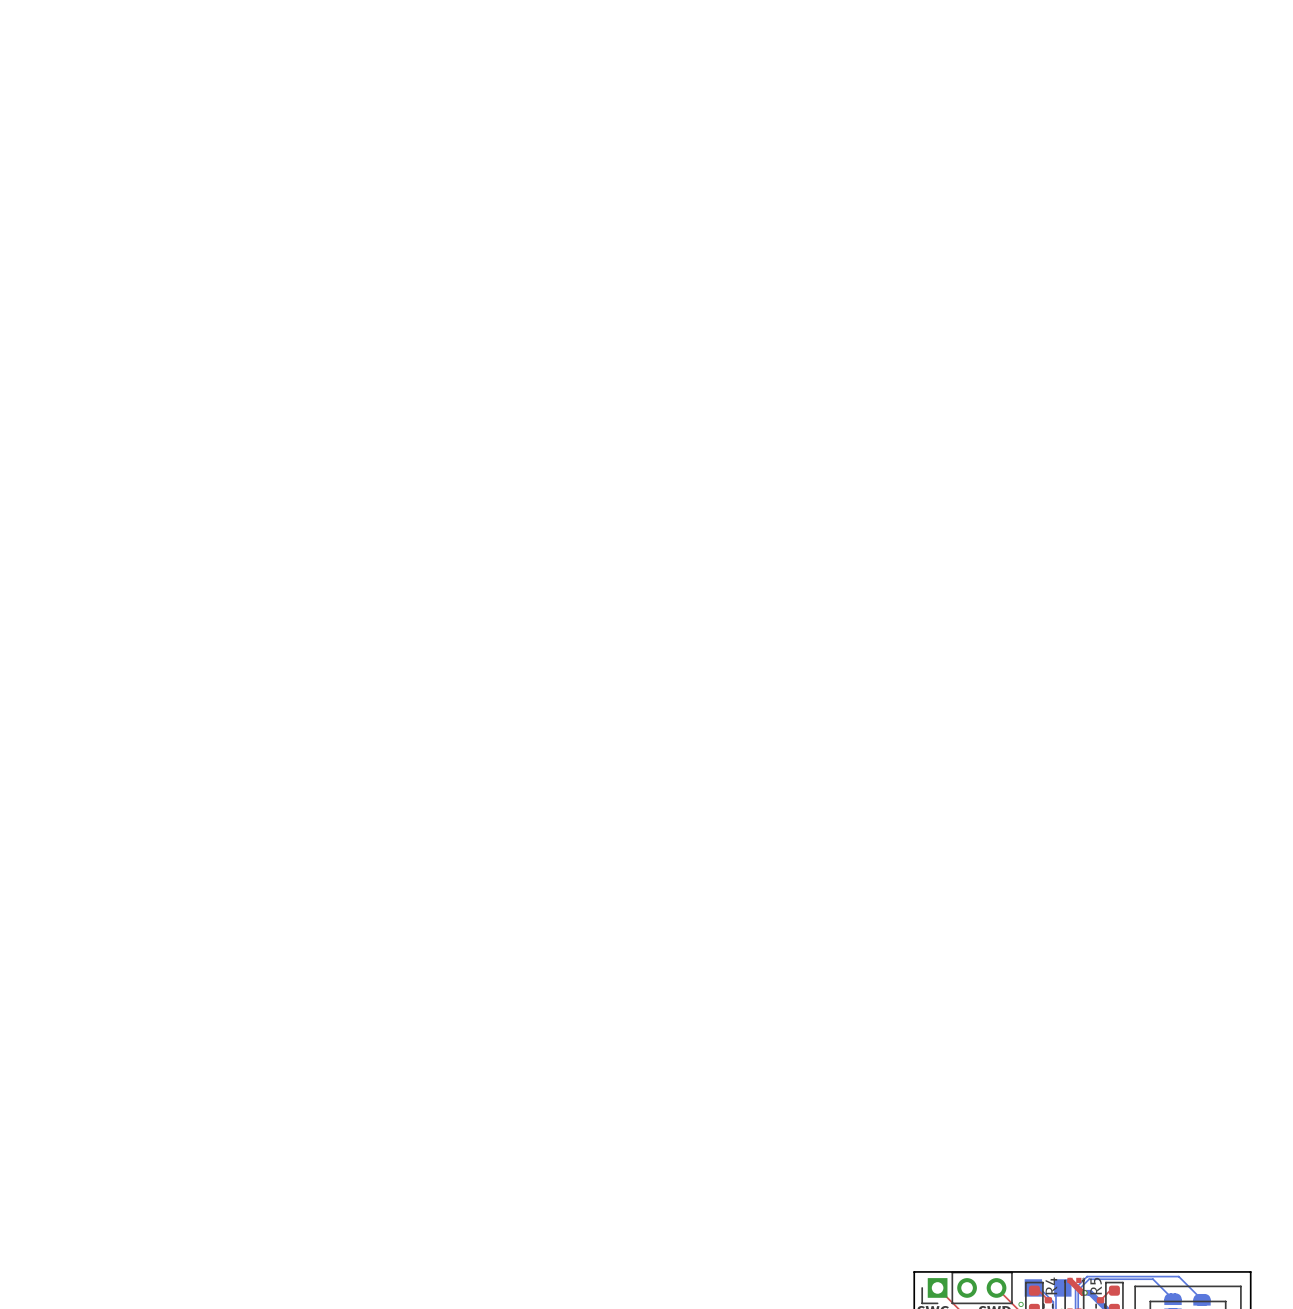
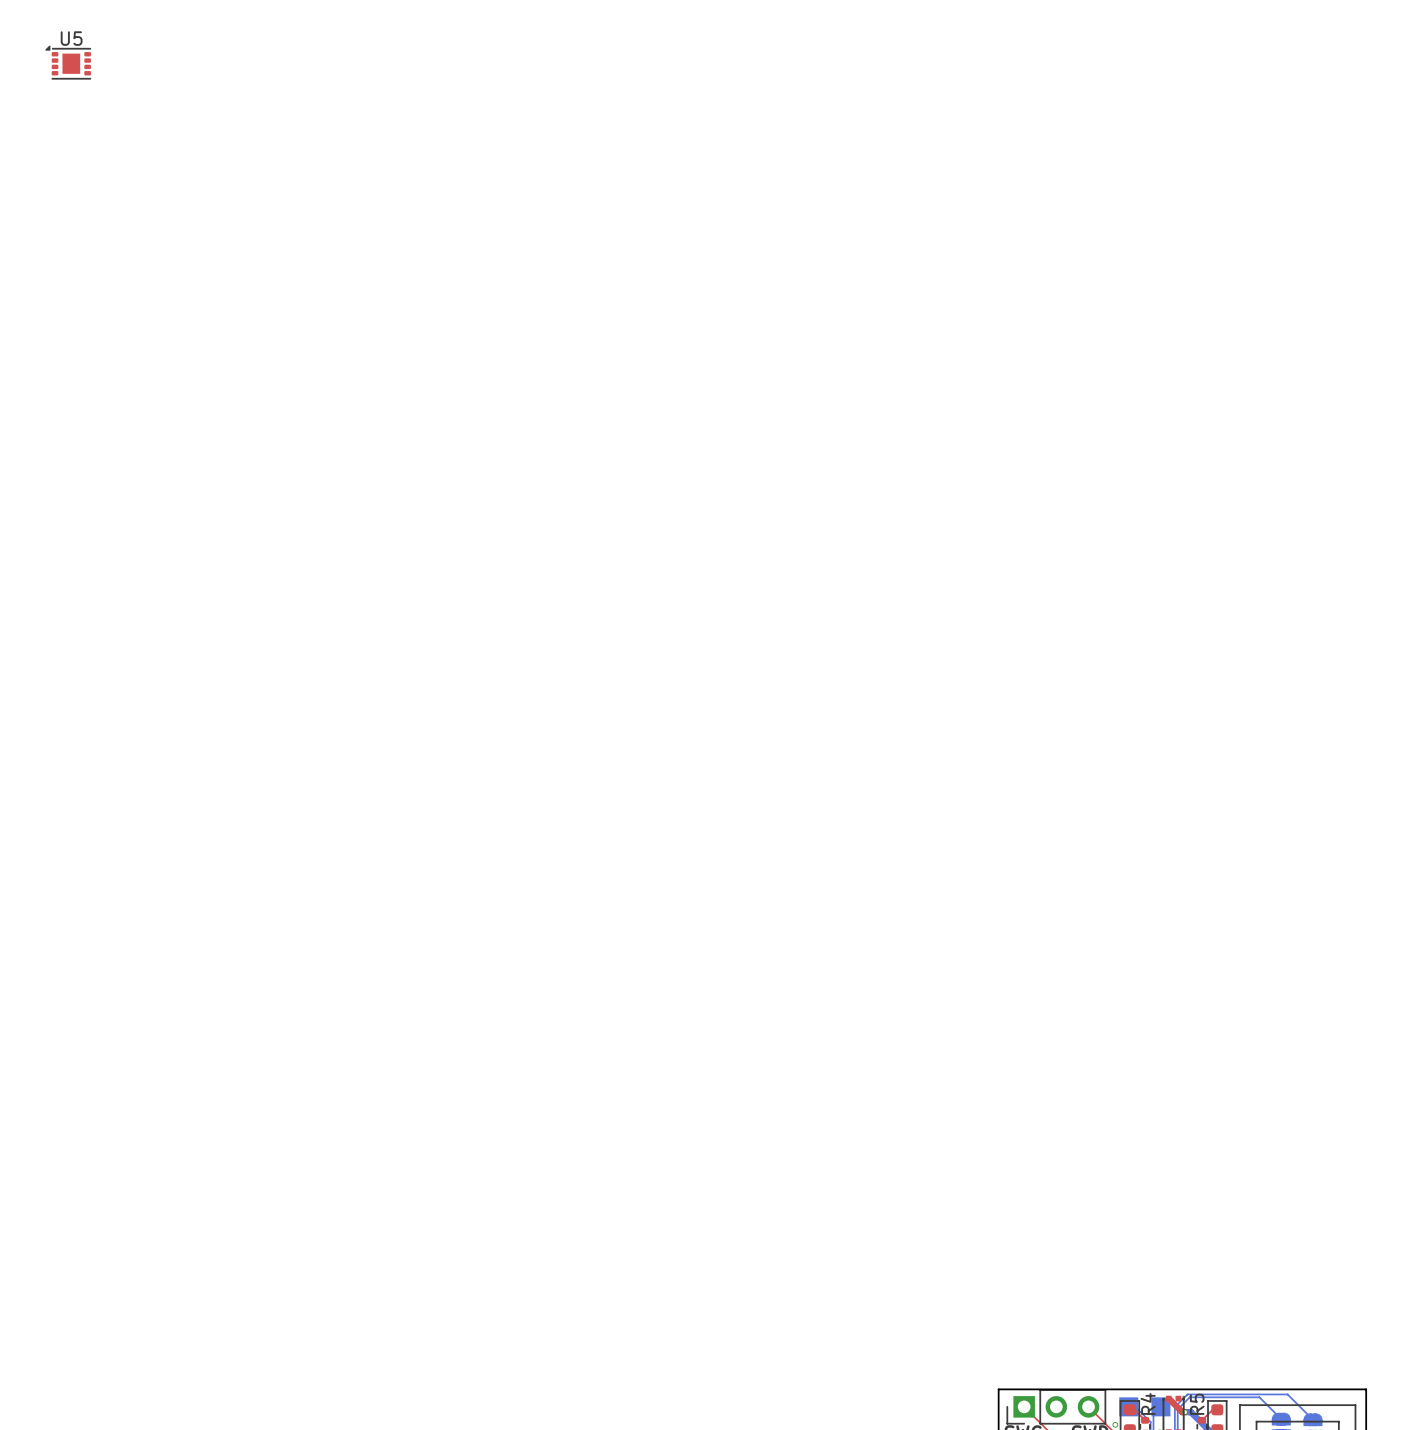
U5: none -> (68, 62)

